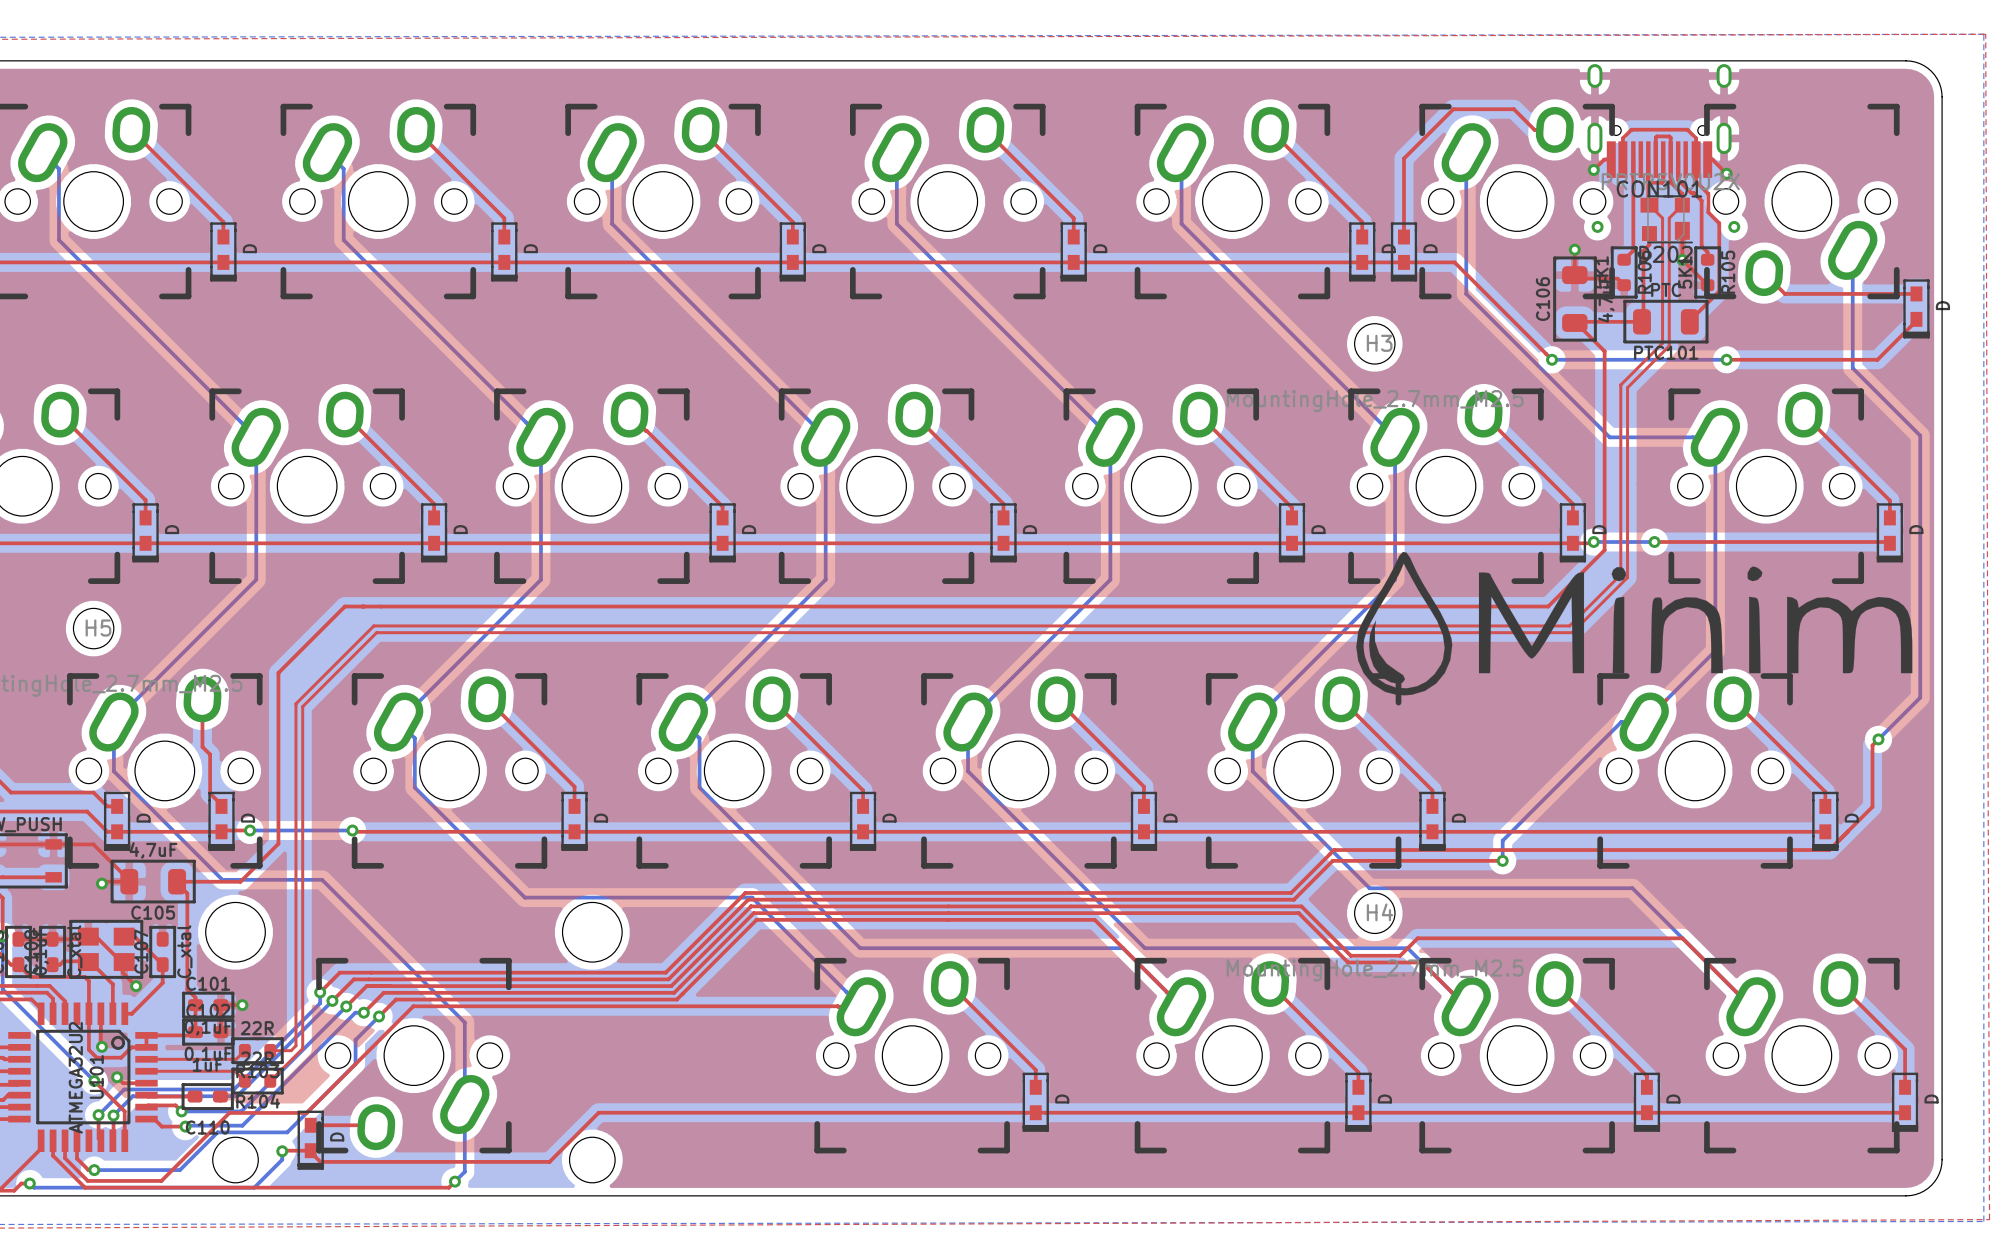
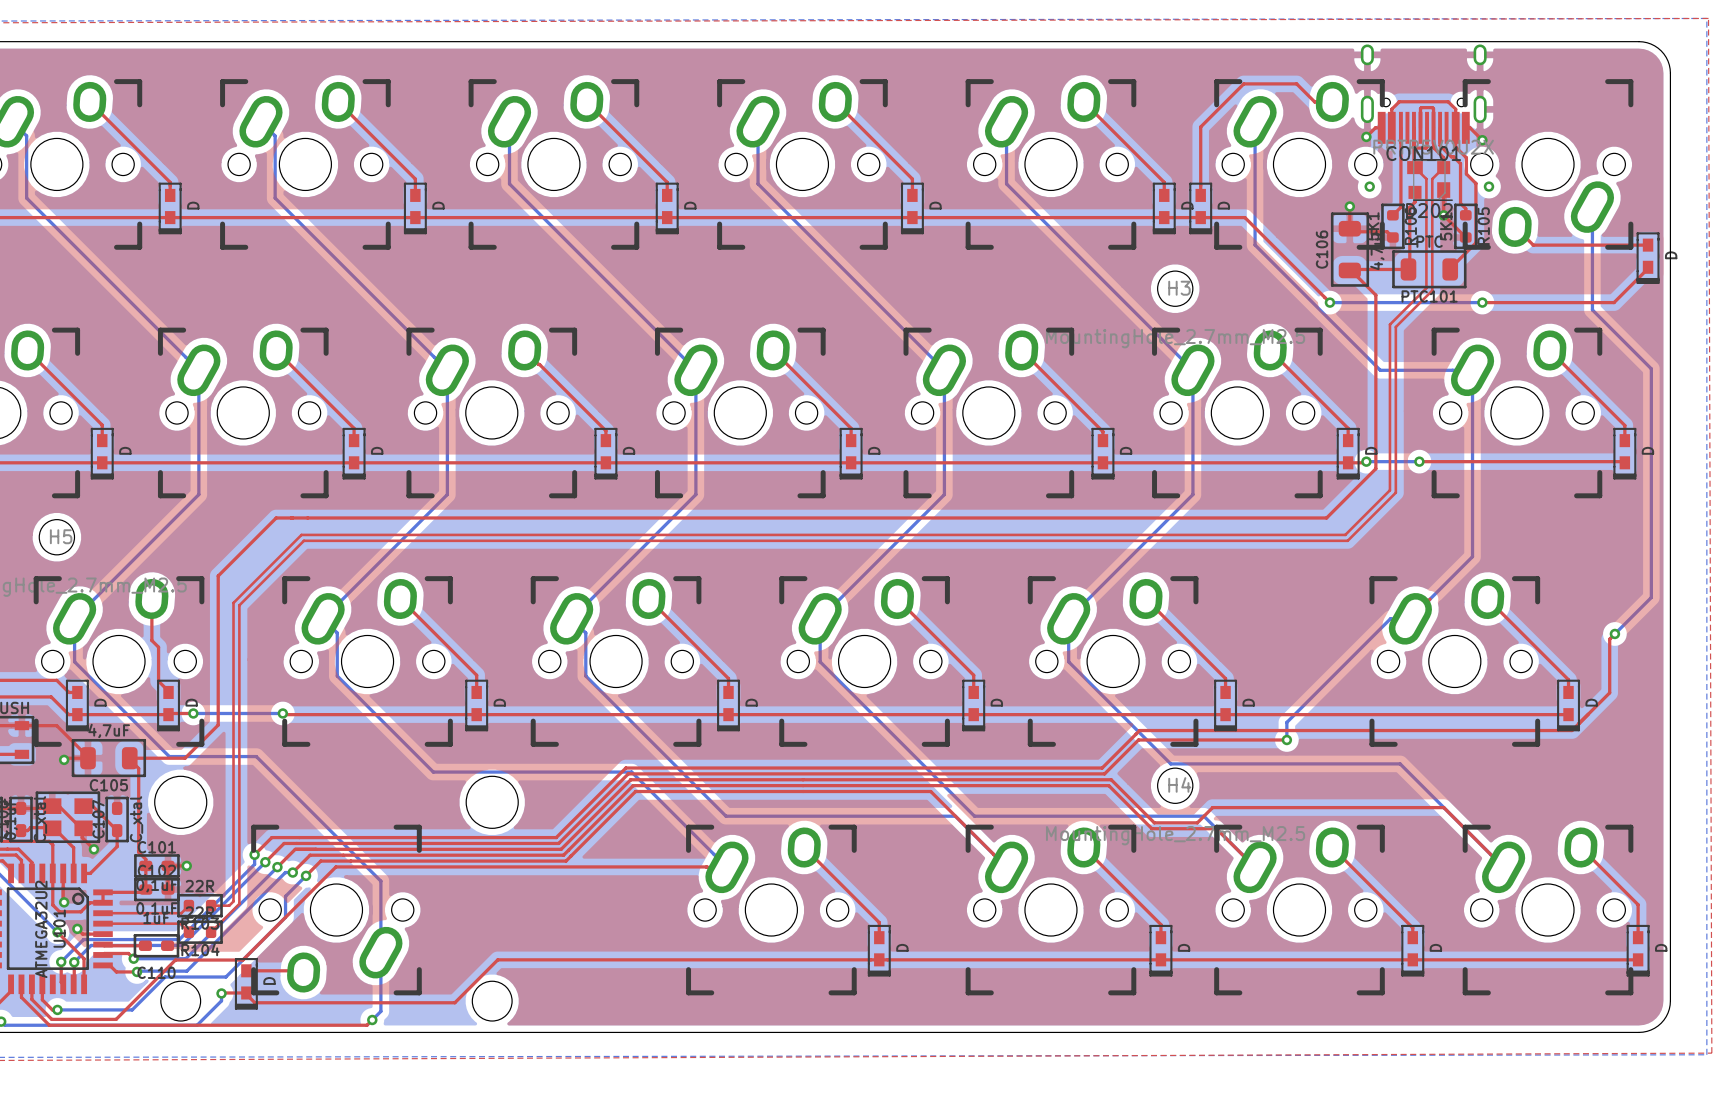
drawing: [1356, 551, 1913, 696] -> none

